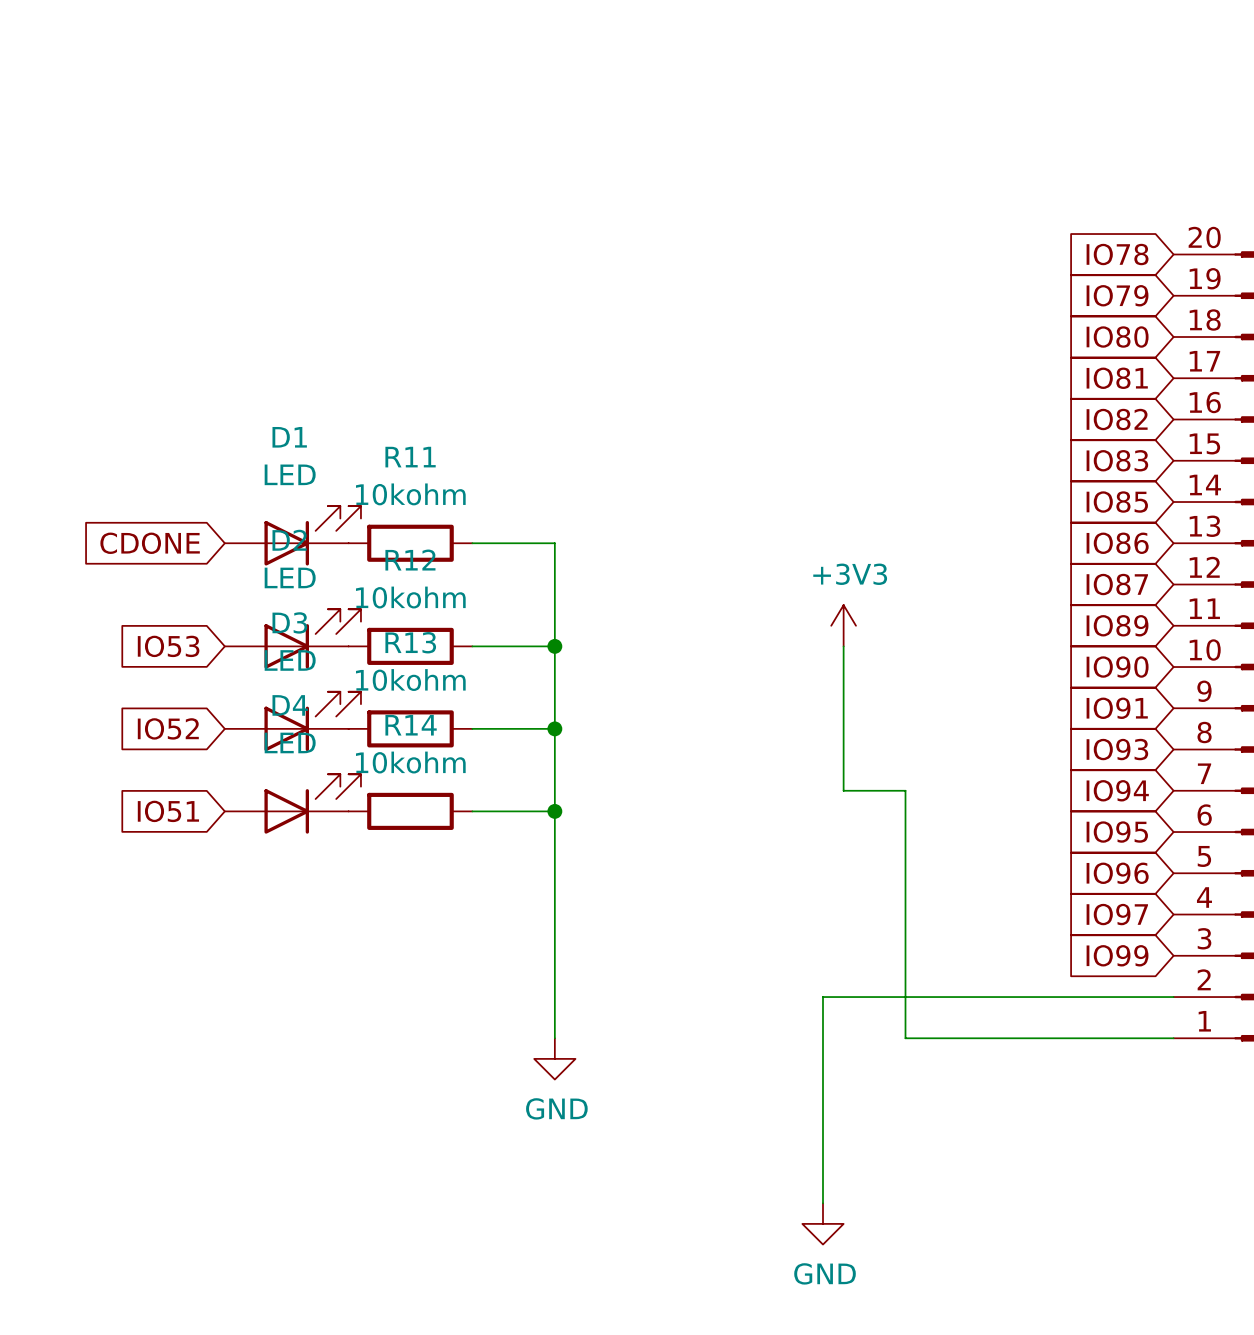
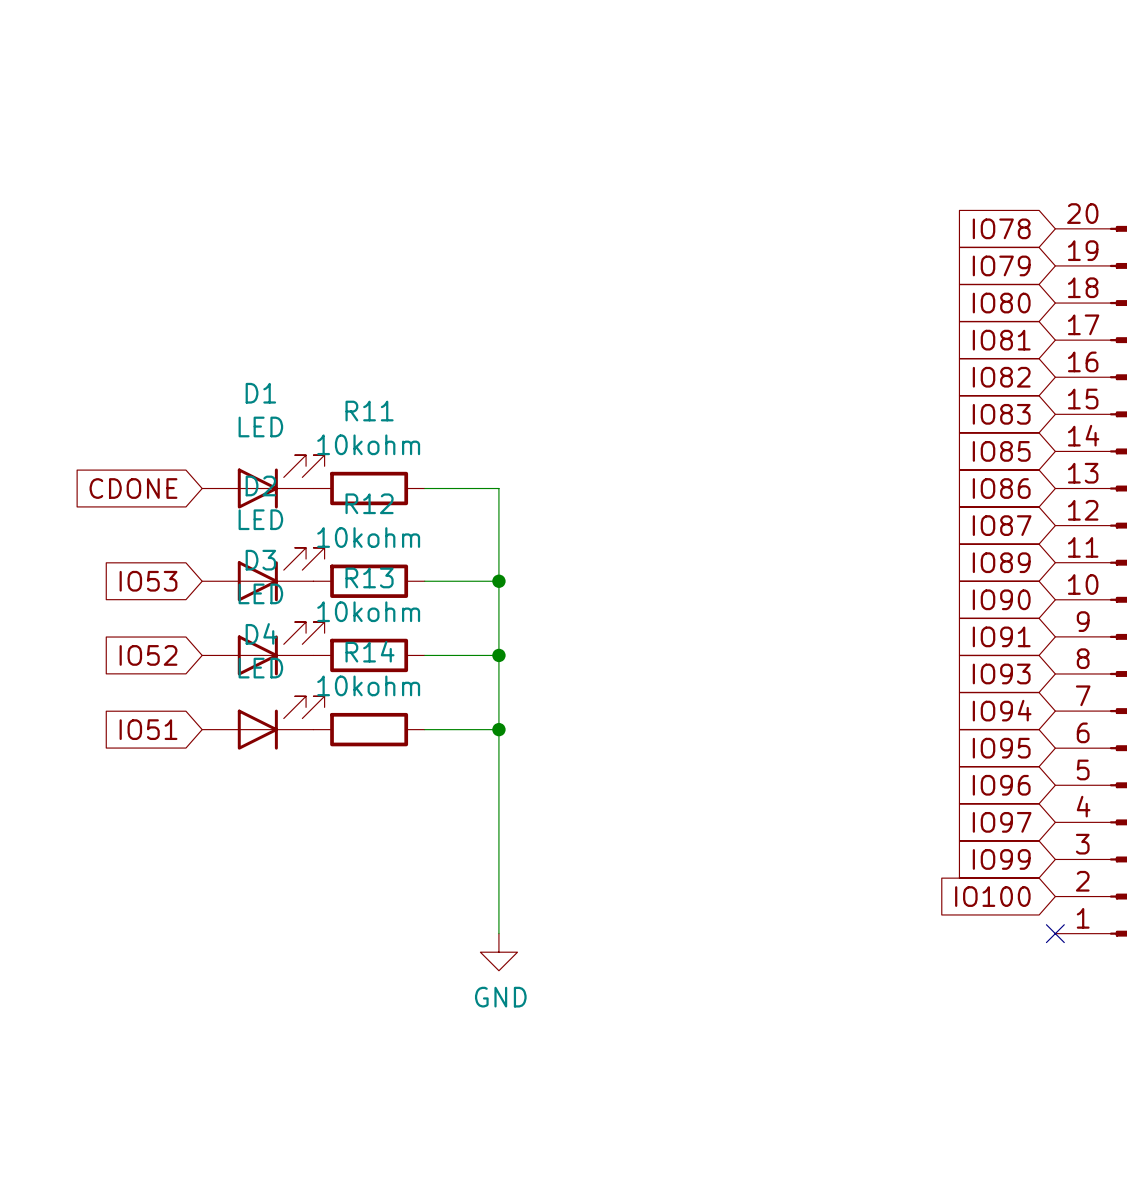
power symbol: +3V3 (843, 625) -> none
wire: (843, 646) (843, 790) (905, 790) (905, 1038) (1173, 1038) -> none
global label: none -> IO100 (992, 896)
wire: (1173, 997) (822, 997) (822, 1203) -> none
no-connect mark: none -> (1055, 933)
power symbol: GND (822, 1223) -> none

